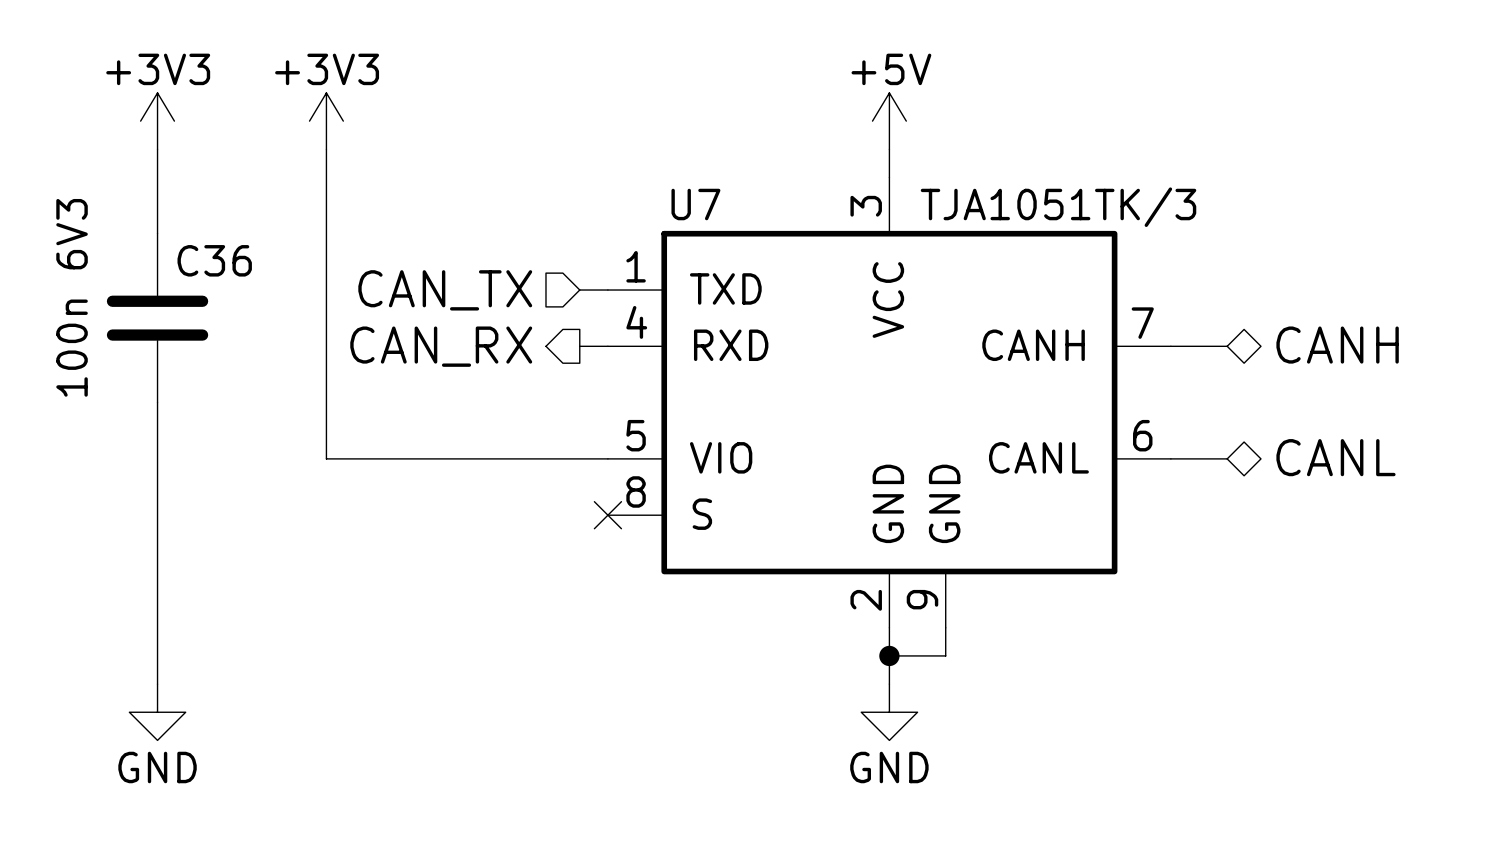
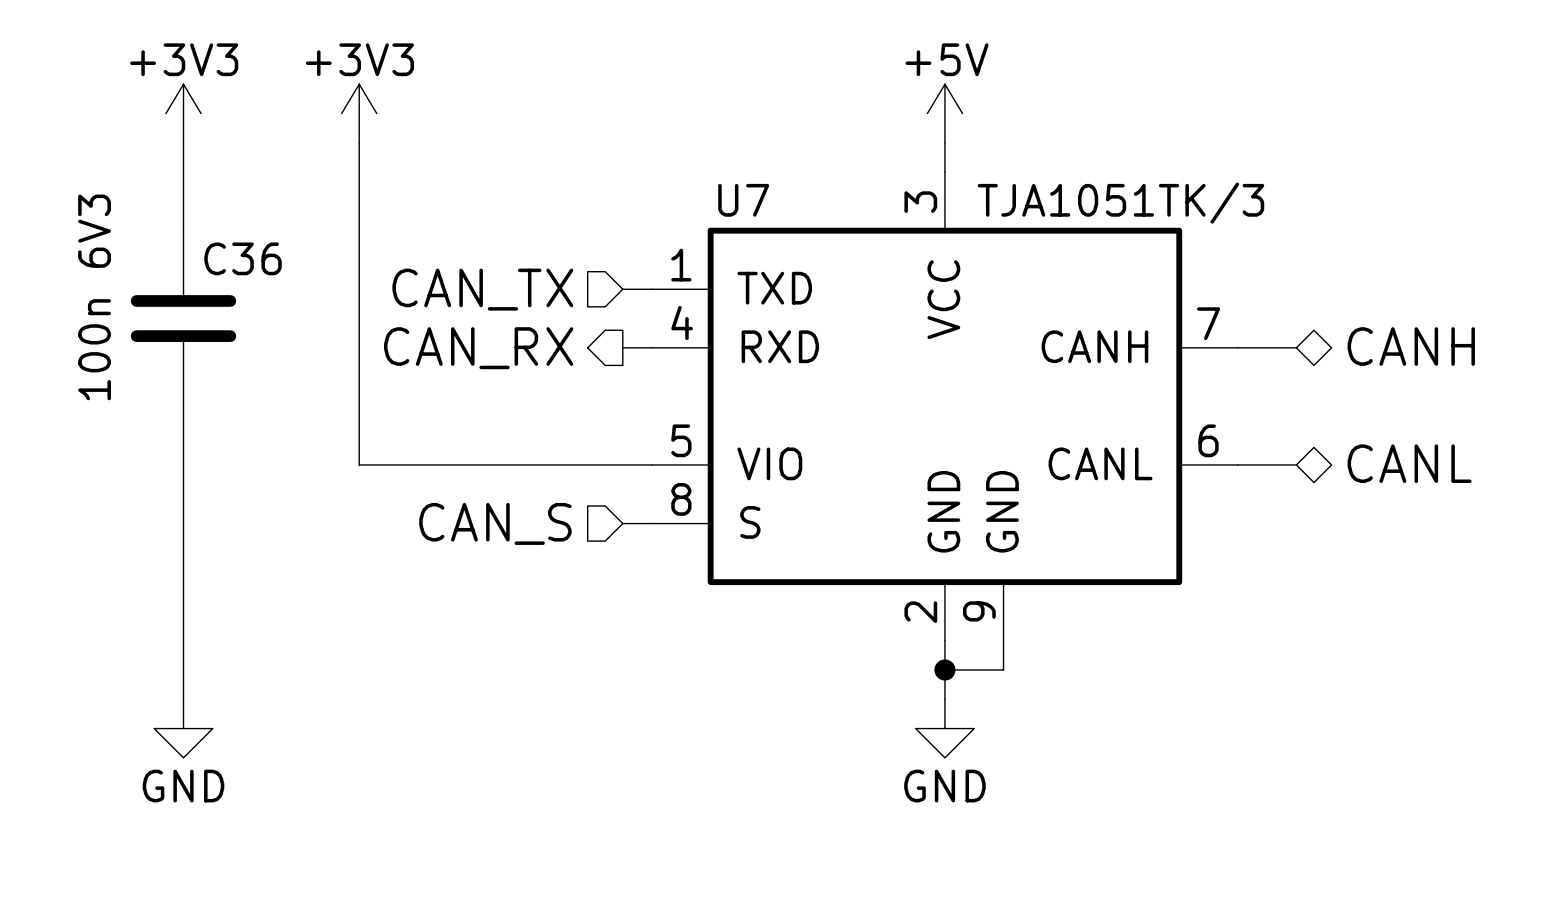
hierarchical label: none -> CAN_S (495, 523)
wire: none -> (622, 523) (652, 523)
no-connect mark: (607, 515) -> none

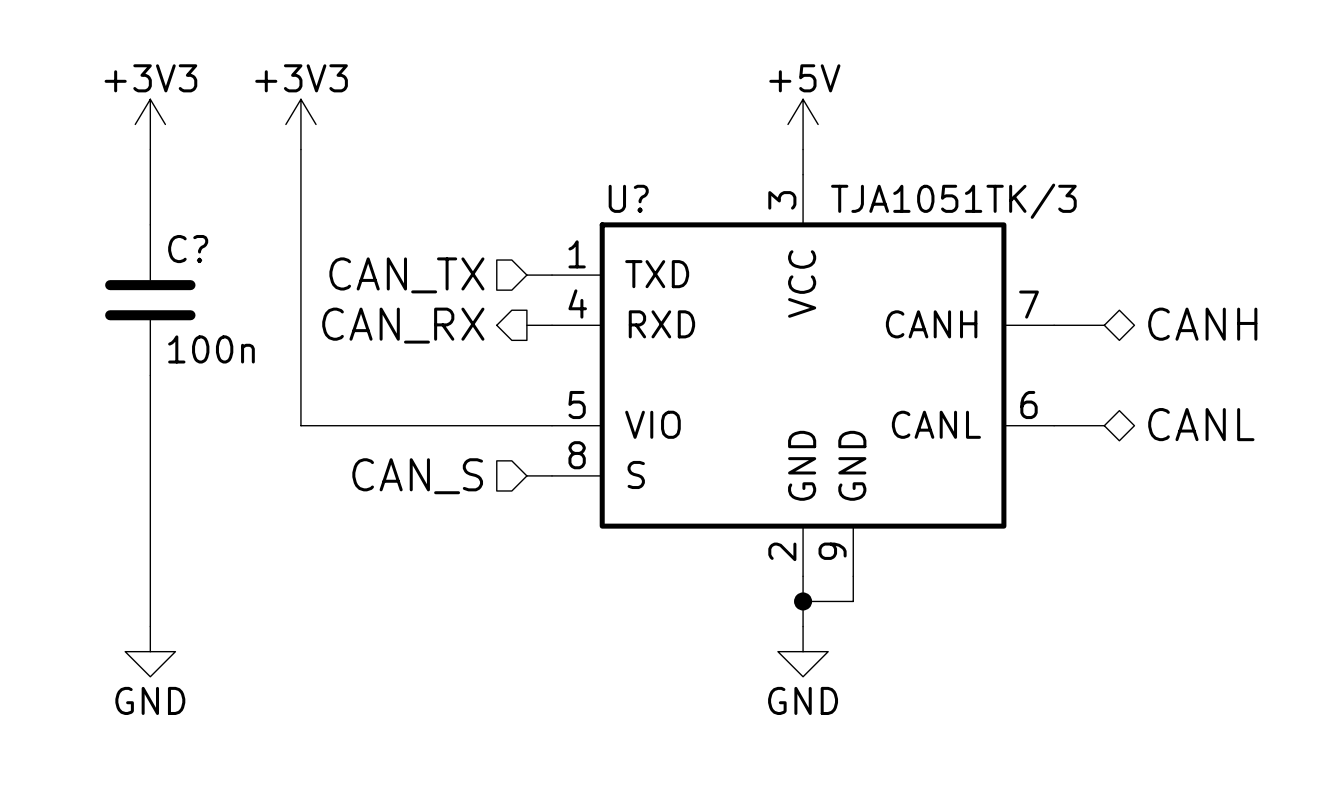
U7 name: U7 (743, 200) -> U? (628, 198)
C36 name: C36 (242, 258) -> C? (188, 249)
C36 value: 100n 6V3 (94, 297) -> 100n (211, 349)

